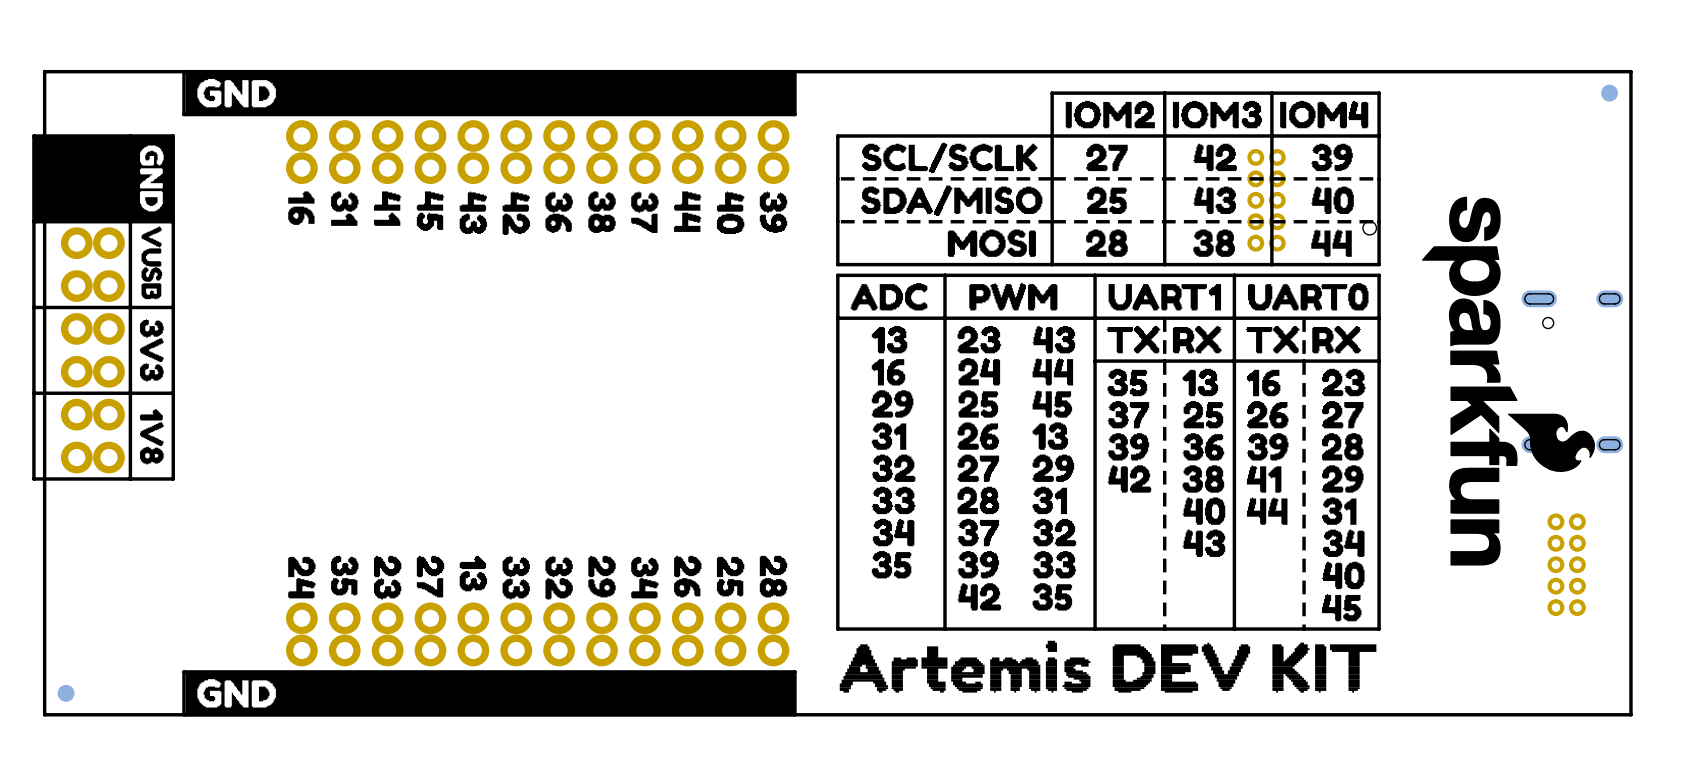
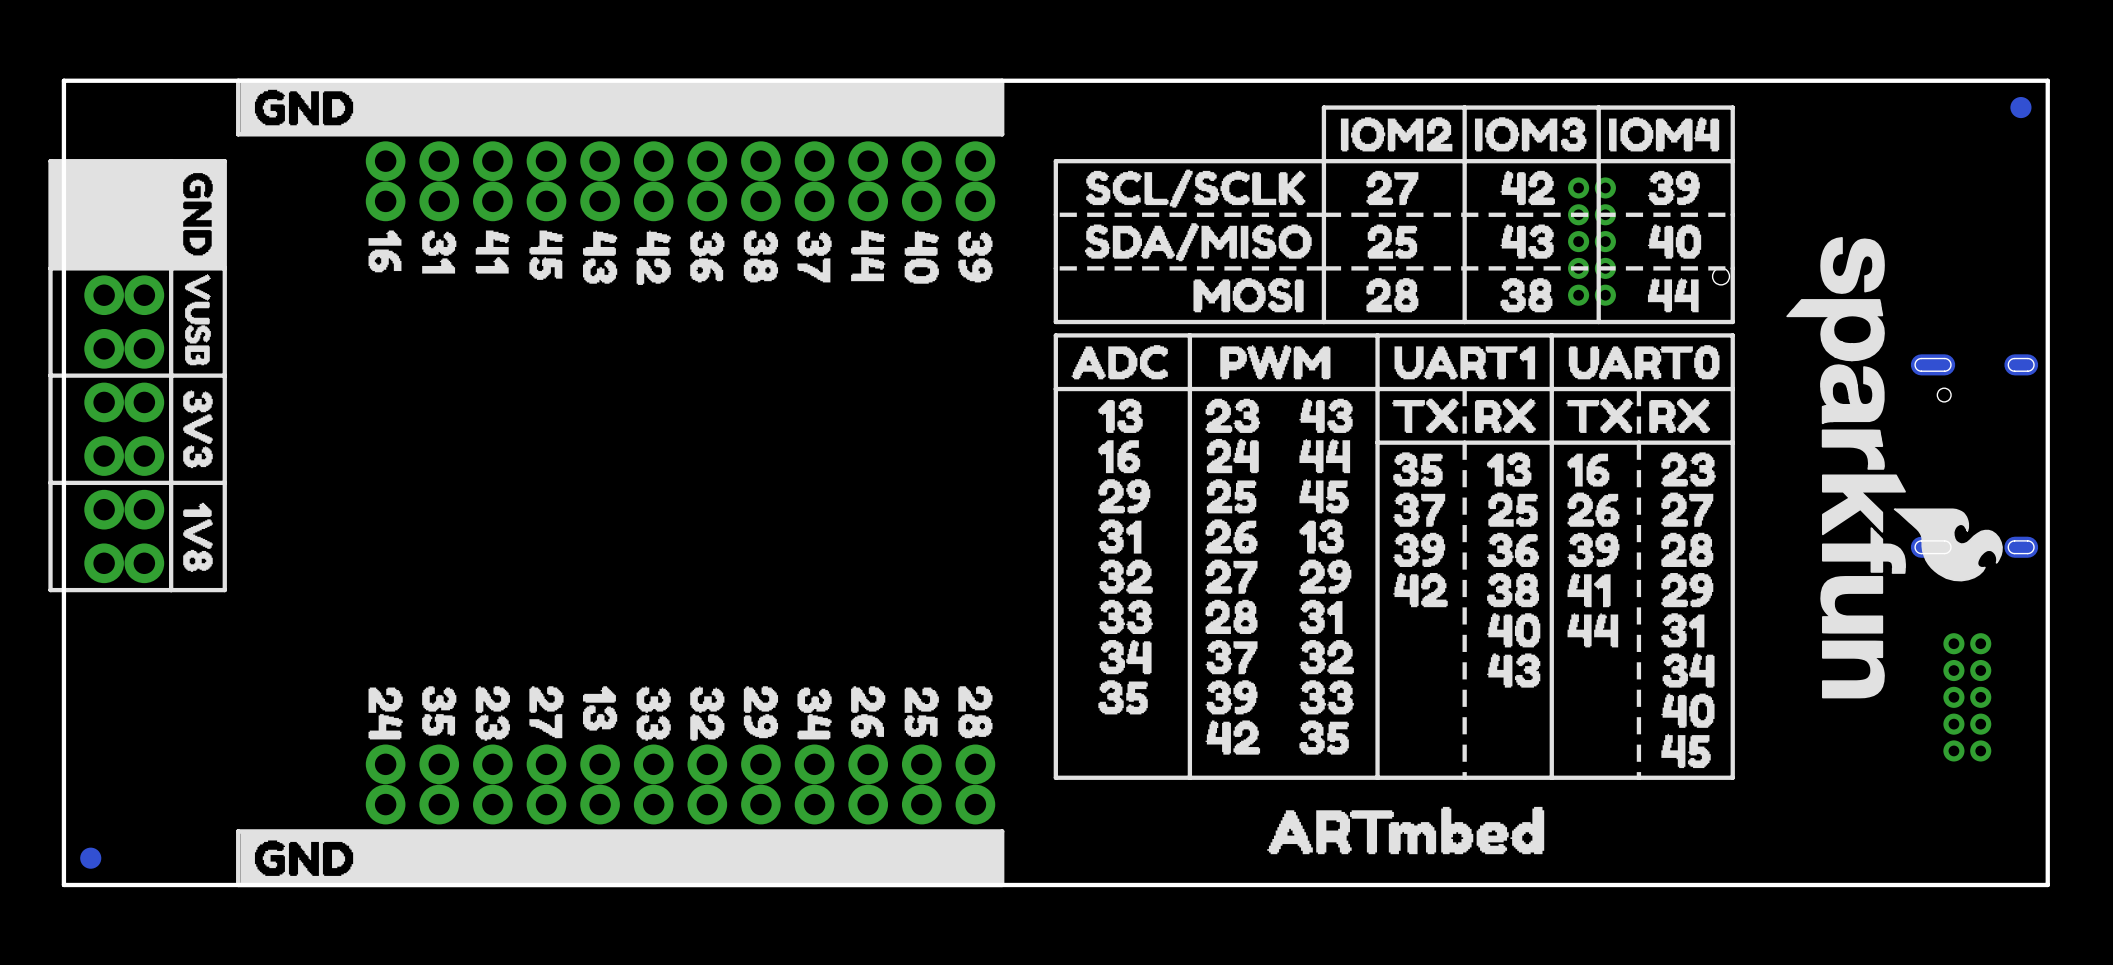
drawing shape: [839, 640, 1377, 693] -> [1267, 806, 1545, 855]

